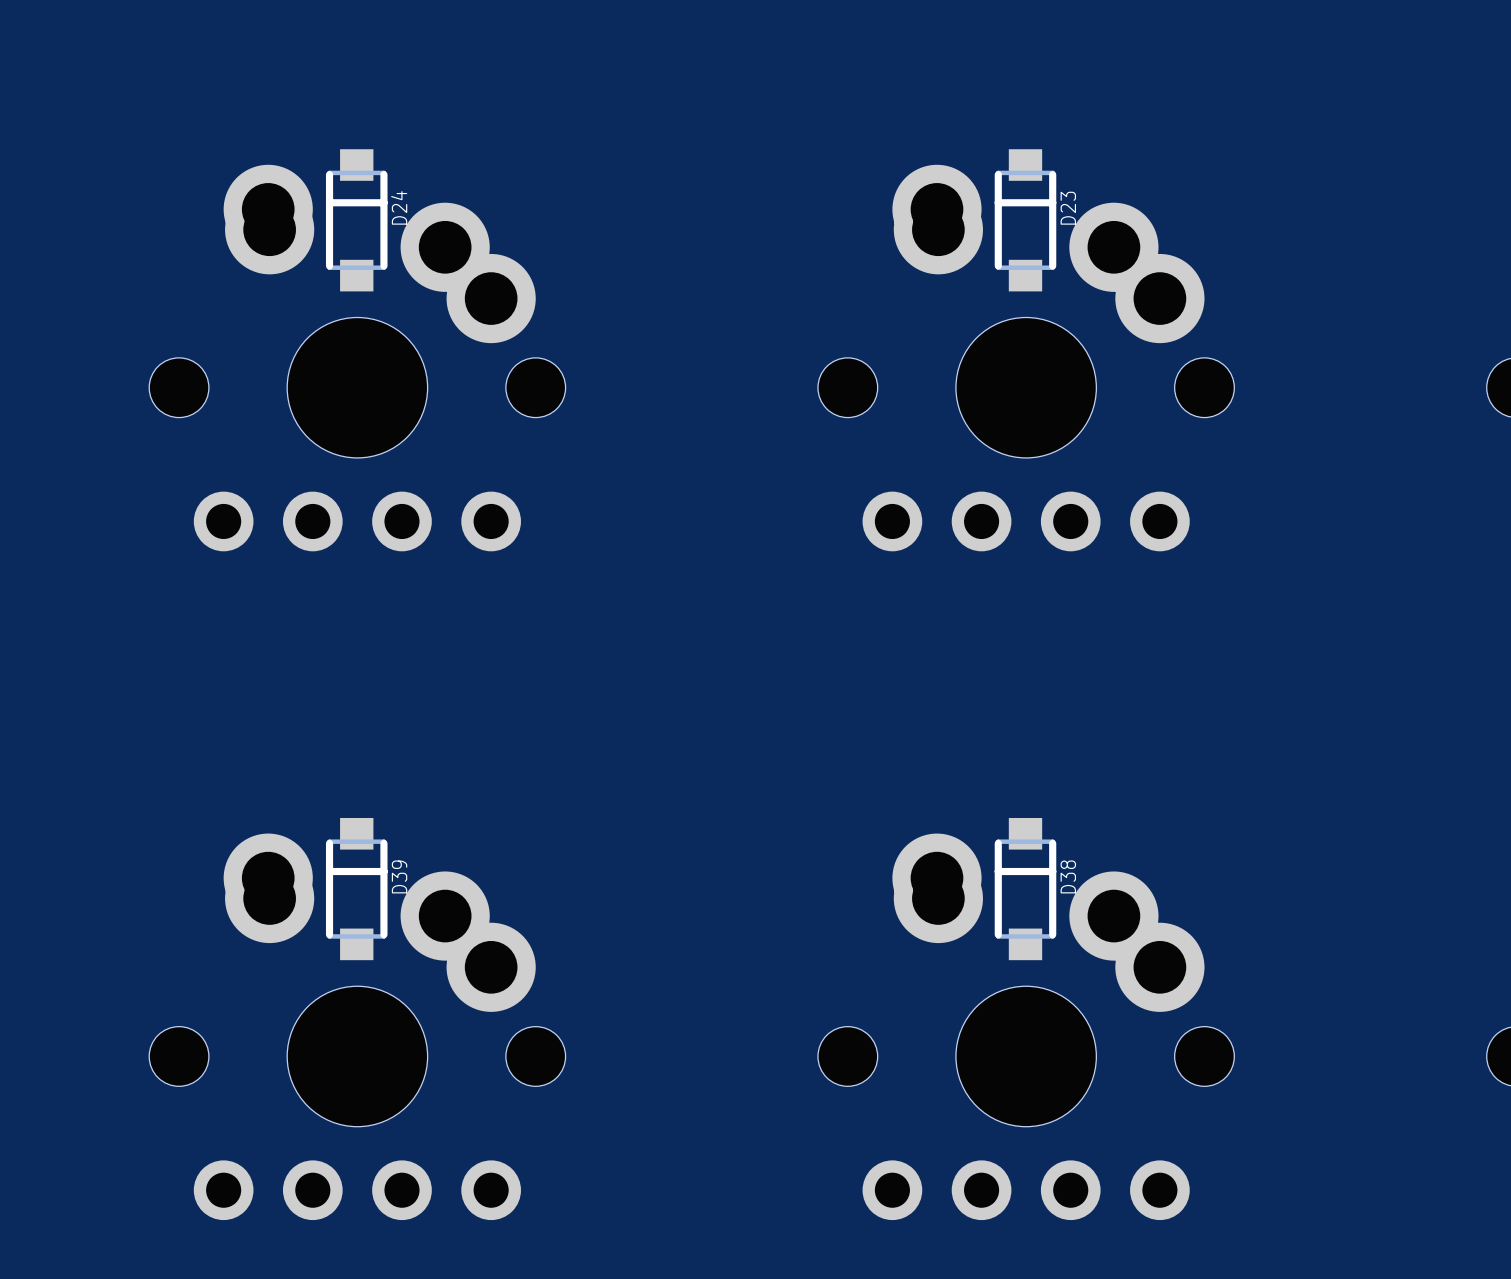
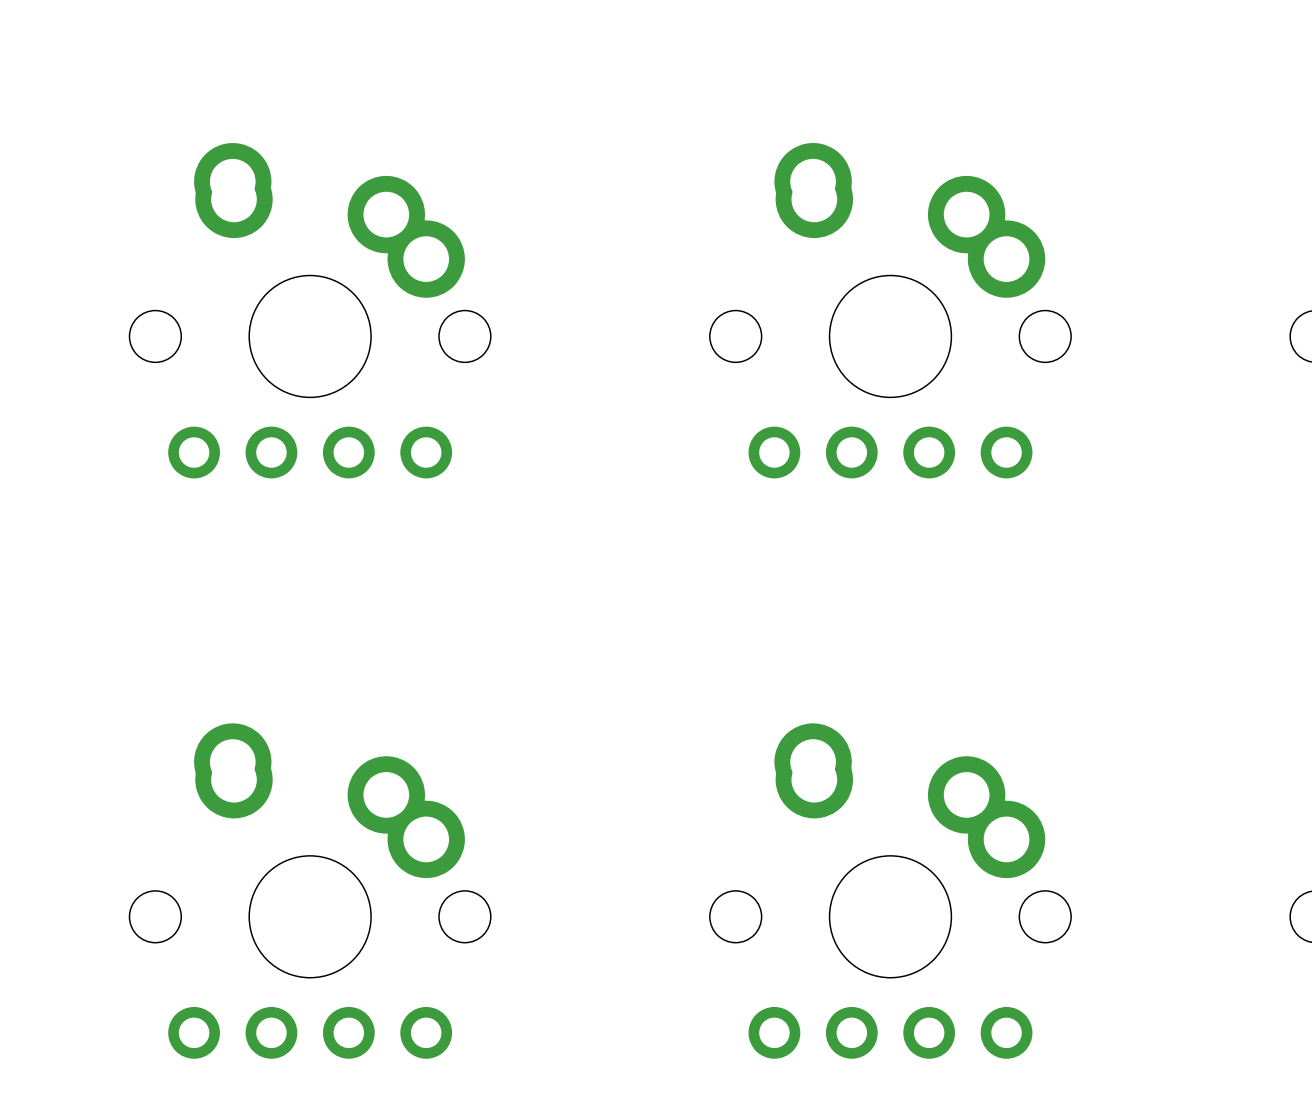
D24: (356, 220) -> none
D23: (1025, 220) -> none
D39: (356, 889) -> none
D38: (1025, 889) -> none

